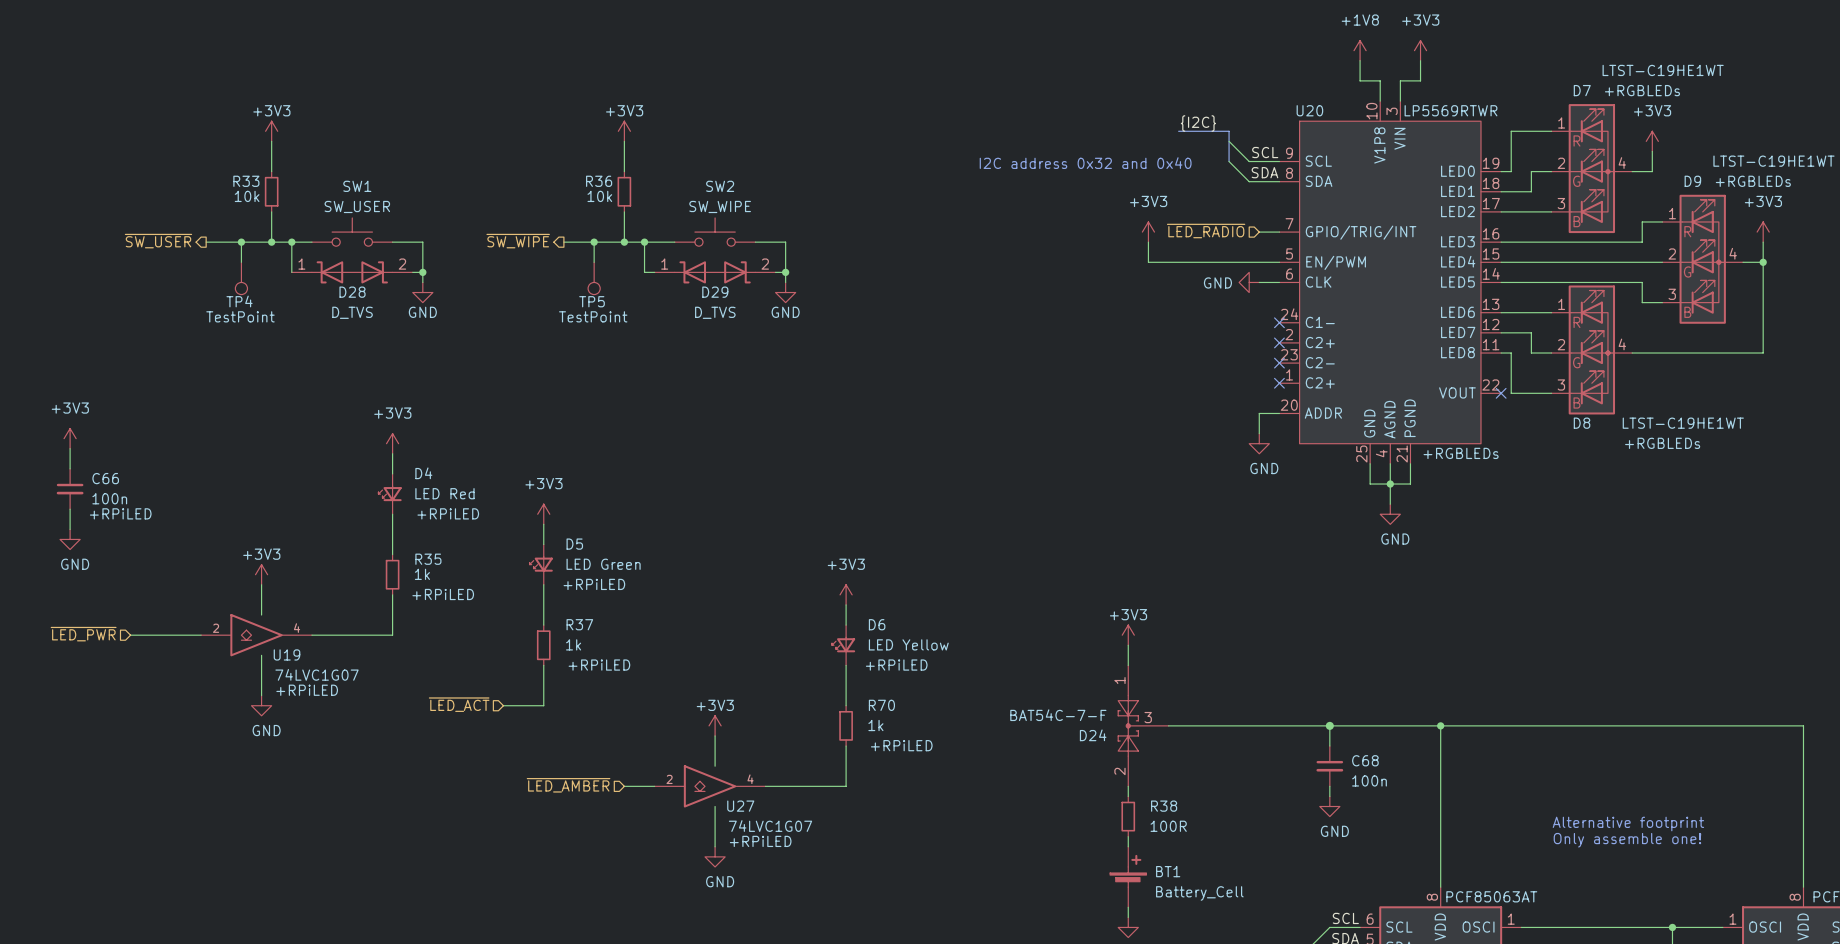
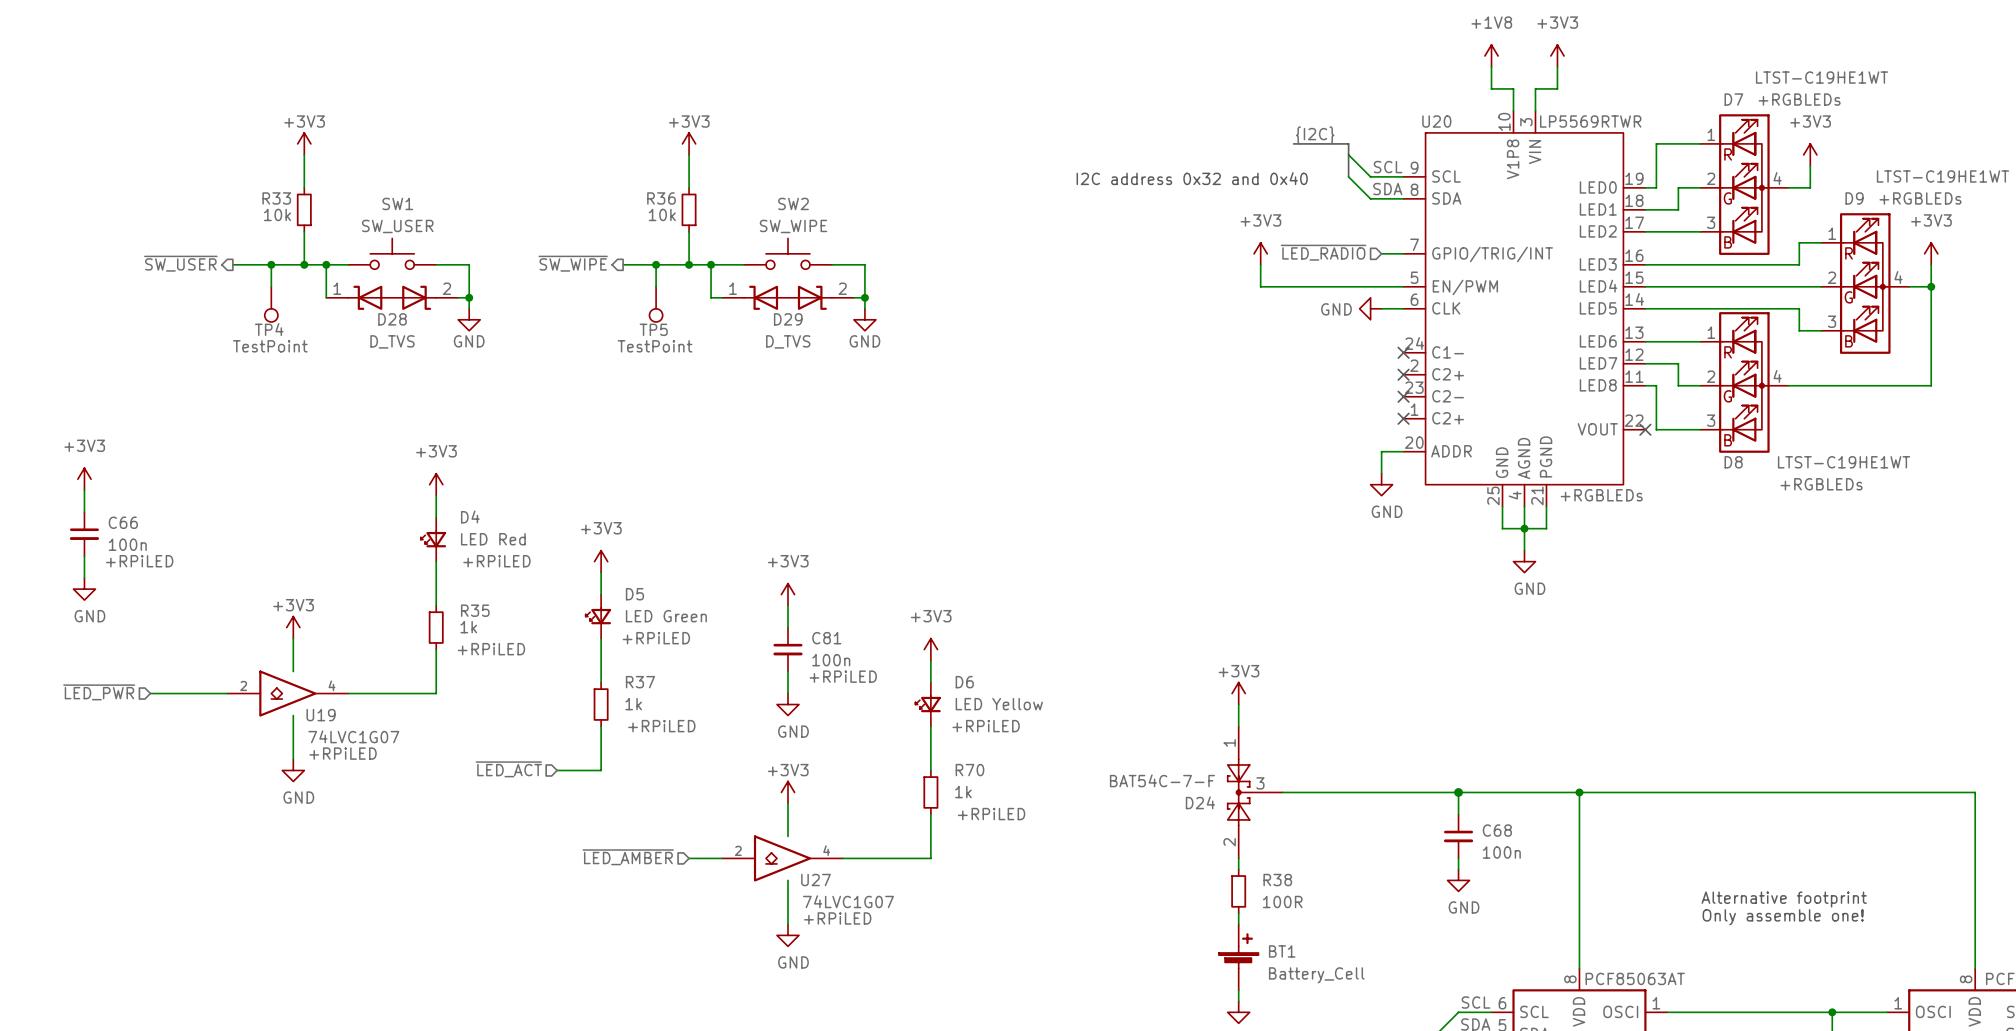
power symbol: none -> +3V3 (787, 594)
wire: none -> (787, 605) (787, 627)
C81: none -> 100n (787, 649)
wire: none -> (787, 671) (787, 693)
power symbol: none -> GND (787, 704)

